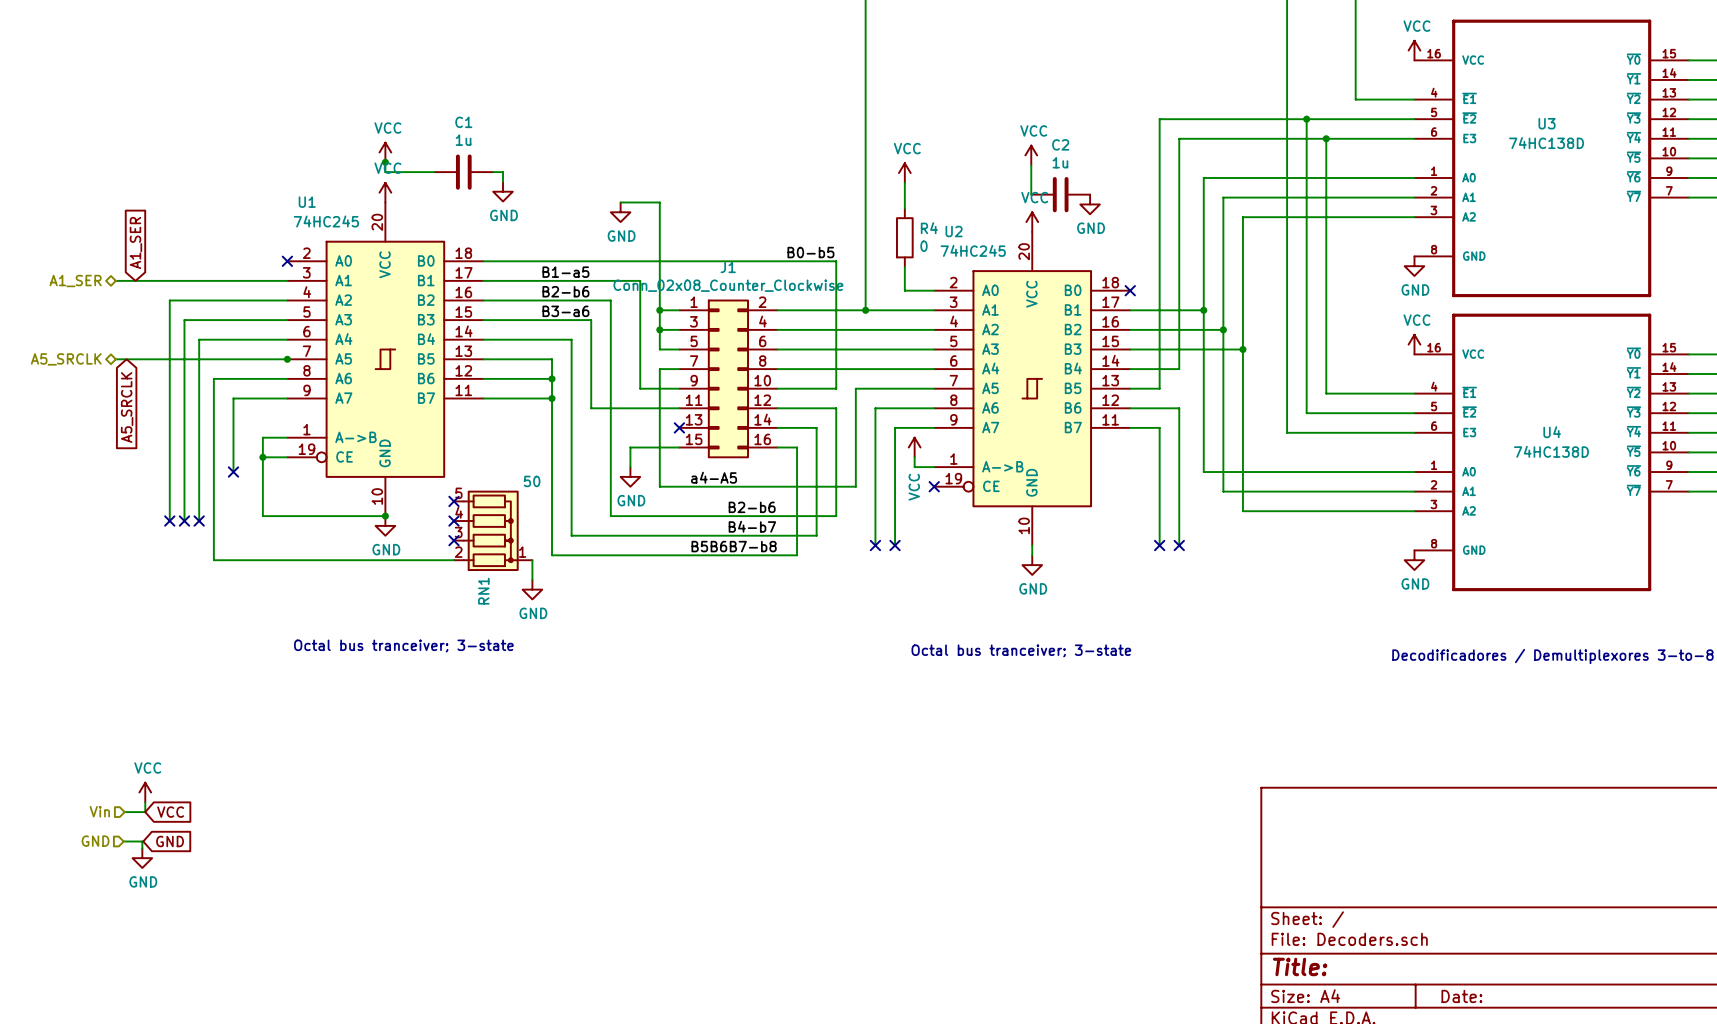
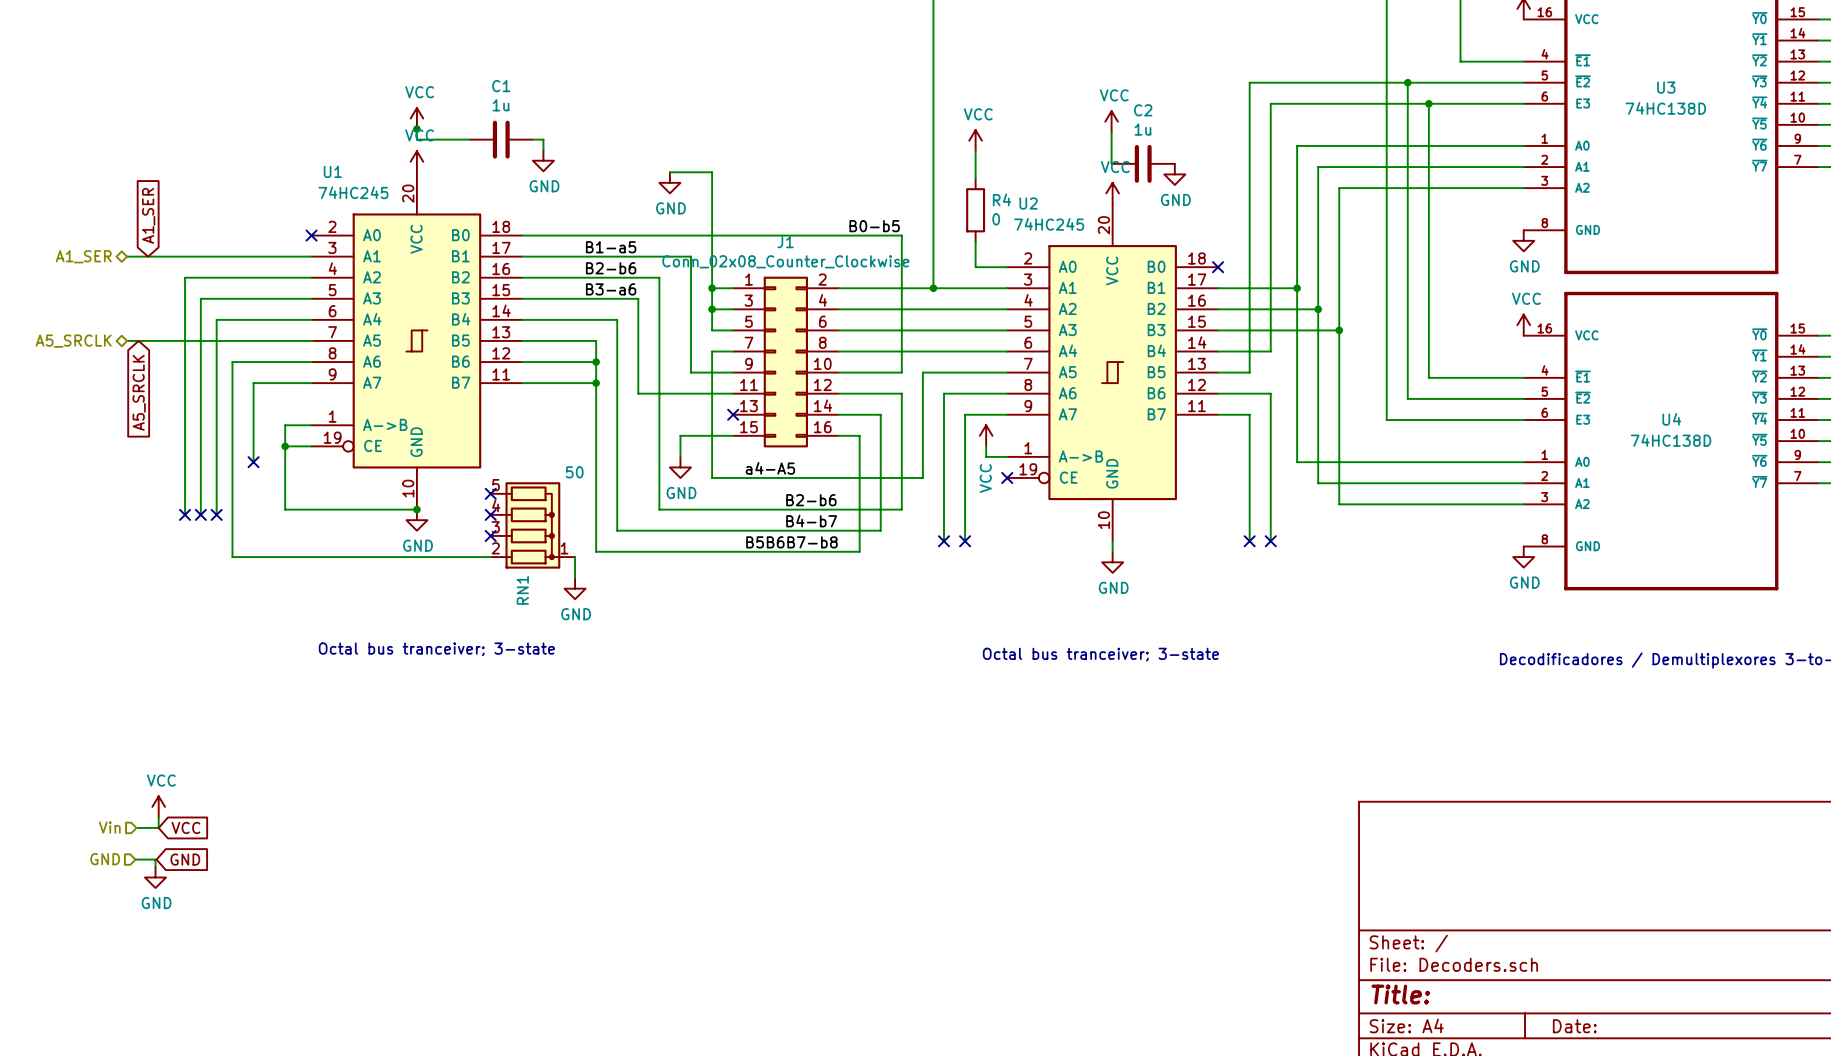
junction: (287, 359) -> none

